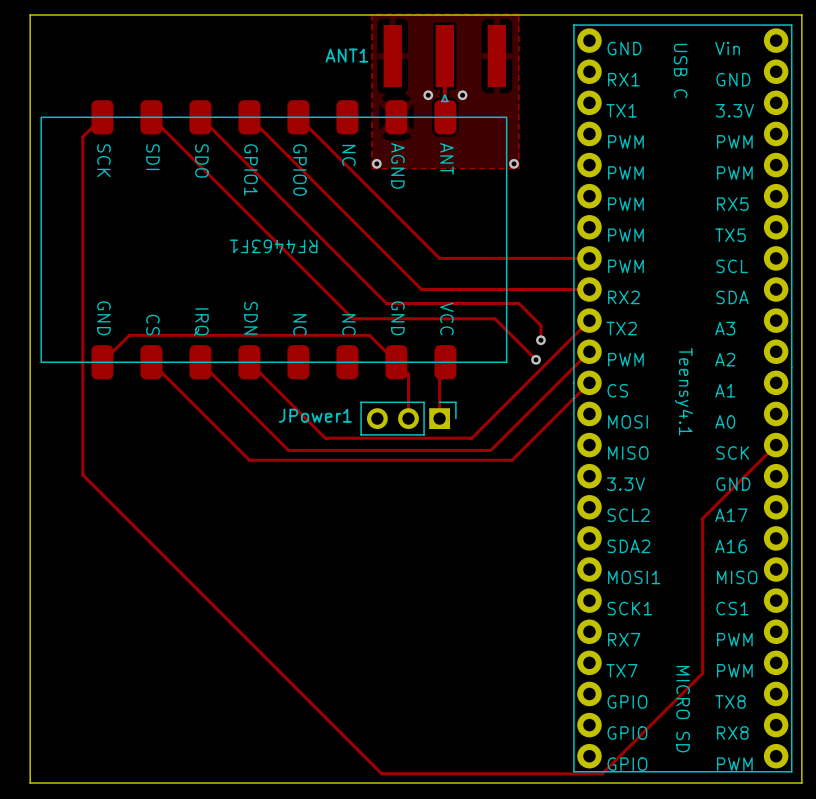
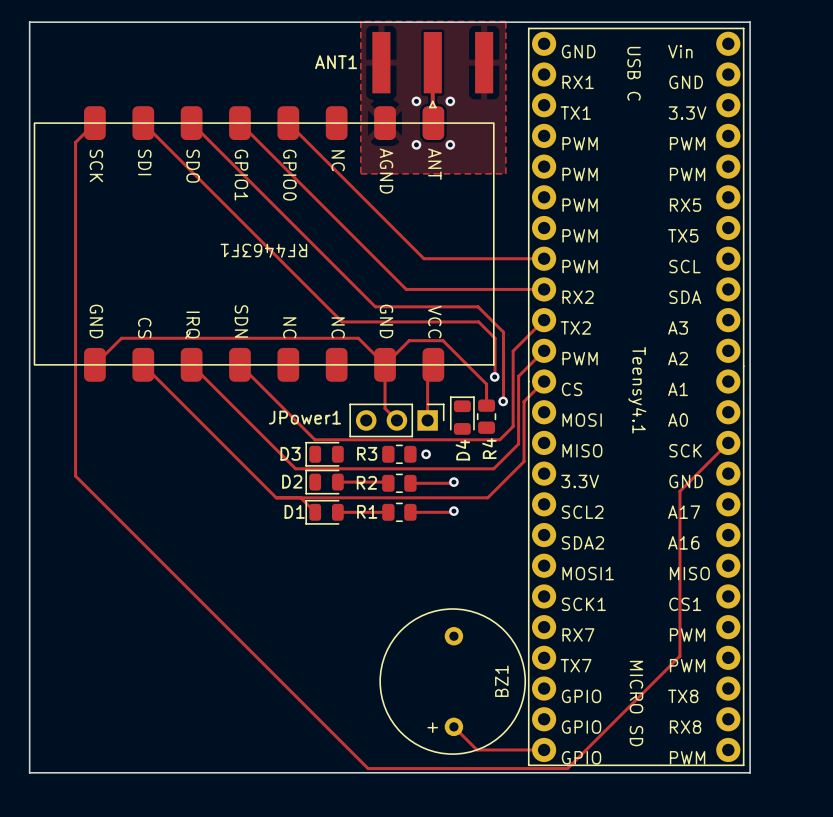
board edge: (36, 15) (30, 15) (30, 783) (801, 783) (801, 15) (766, 15) -> (29, 22) (29, 772) (750, 772) (750, 22)
via: none -> (416, 144)
via: none -> (450, 144)
via: (376, 163) -> none
via: (514, 163) -> none
track: (435, 254) (439, 258) (589, 258) -> (423, 258) (544, 258)
track: (417, 285) (421, 289) (589, 289) -> (406, 289) (544, 289)
track: (490, 303) (518, 303) (540, 325) (540, 340) -> (478, 306) (503, 332) (503, 401)
track: (491, 318) (495, 318) (536, 359) -> (478, 321) (495, 338) (494, 376)
track: (589, 320) (471, 438) -> (544, 320) (513, 351) (513, 426) (499, 439) (459, 439)
via: (540, 340) -> none
track: (589, 351) (490, 450) (288, 450) -> (544, 350) (518, 376) (518, 444) (493, 468) (295, 468) (278, 451)
via: (536, 359) -> none
track: (396, 362) (408, 374) (408, 418) -> (486, 405) (486, 384) (443, 340) (409, 340) (385, 364) (385, 408) (396, 420)
via: none -> (494, 376)
track: (589, 382) (512, 460) (249, 460) -> (544, 381) (524, 401) (524, 461) (487, 497) (276, 497) (239, 461)
Teensy4.1 position: (682, 398) -> (636, 396)
via: none -> (503, 401)
D4: none -> (462, 415)
R4: none -> (486, 416)
track: (776, 445) (702, 518) (702, 673) (602, 773) (381, 773) (379, 771) -> (728, 442) (679, 491) (679, 656) (567, 768) (368, 768)
D3: none -> (324, 454)
R3: none -> (399, 454)
via: none -> (426, 454)
D2: none -> (324, 482)
track: none -> (337, 482) (387, 482)
track: none -> (453, 482) (410, 483)
via: none -> (453, 482)
R2: none -> (399, 483)
track: none -> (300, 497) (315, 512)
track: none -> (453, 511) (410, 512)
via: none -> (453, 511)
D1: none -> (324, 512)
track: none -> (337, 512) (388, 512)
R1: none -> (399, 512)
BZ1: none -> (452, 681)
track: none -> (453, 726) (477, 749) (544, 749)

